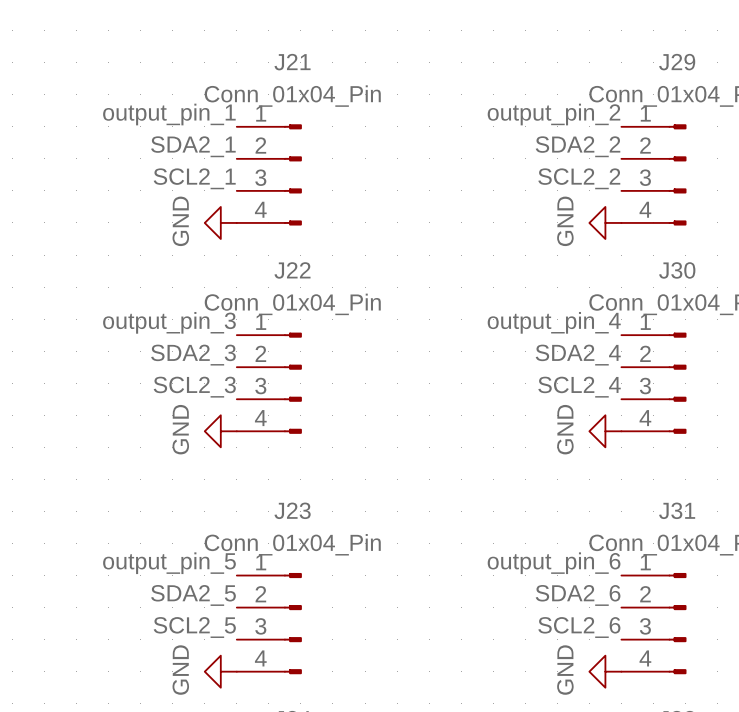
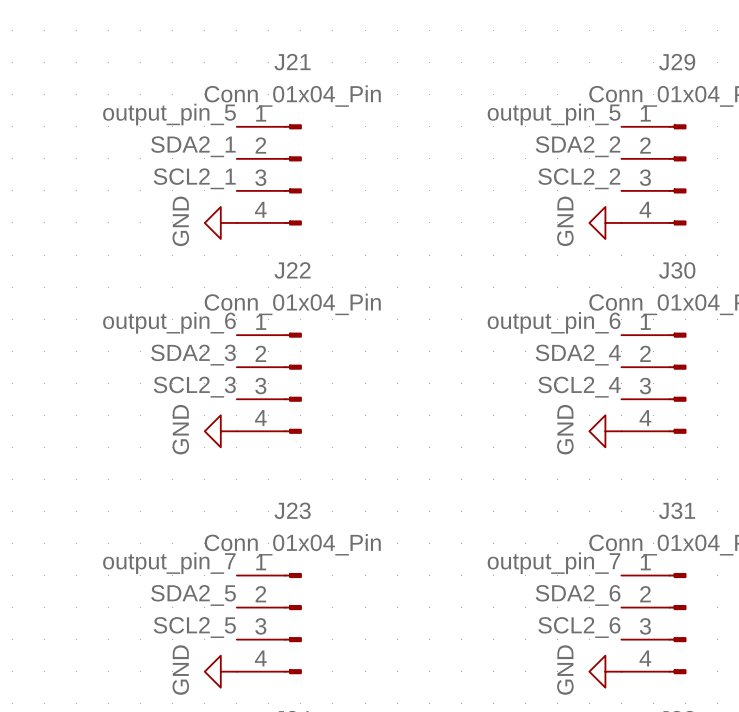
label: output_pin_1 (169, 114) -> output_pin_5 (169, 114)
label: output_pin_2 (553, 114) -> output_pin_5 (554, 114)
label: output_pin_3 (169, 322) -> output_pin_6 (169, 322)
label: output_pin_4 (554, 322) -> output_pin_6 (554, 322)
label: output_pin_5 (169, 563) -> output_pin_7 (169, 563)
label: output_pin_6 (554, 563) -> output_pin_7 (553, 563)

